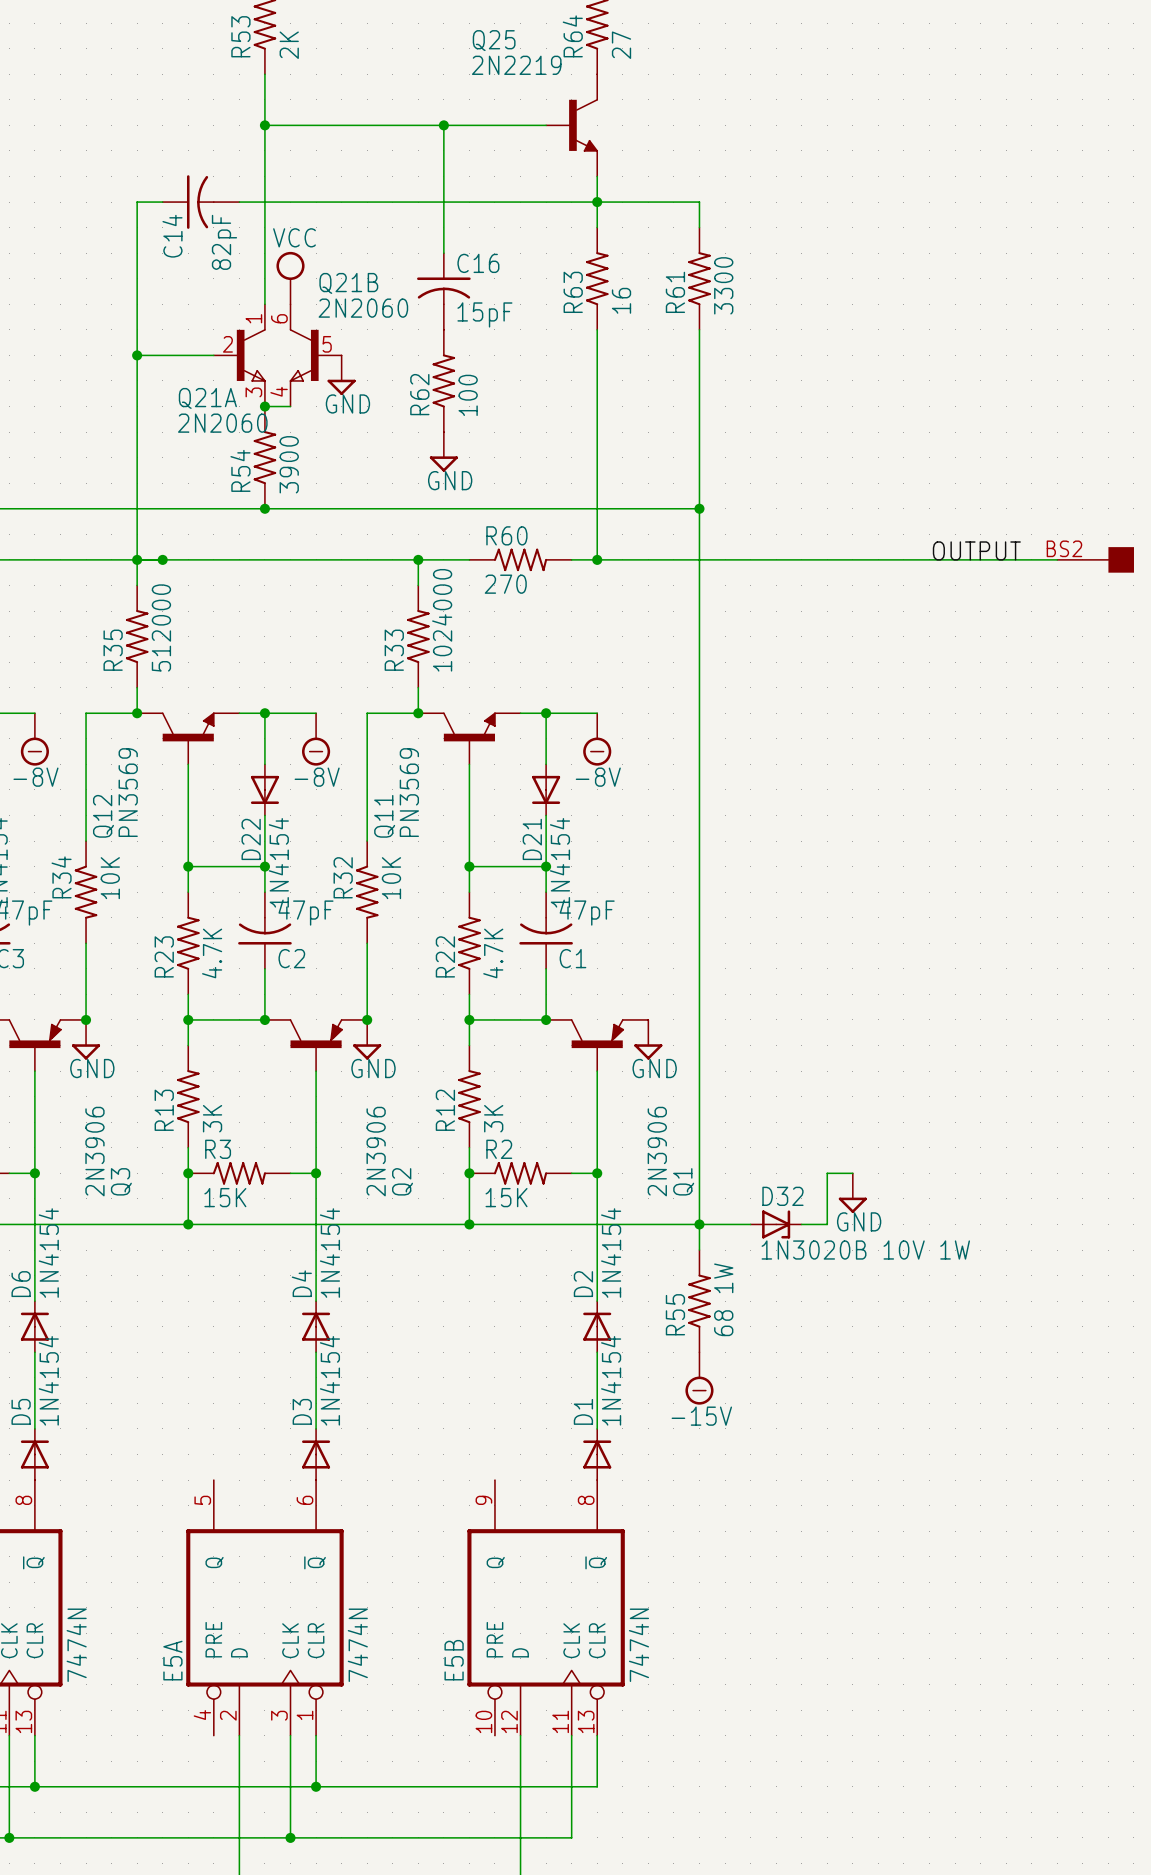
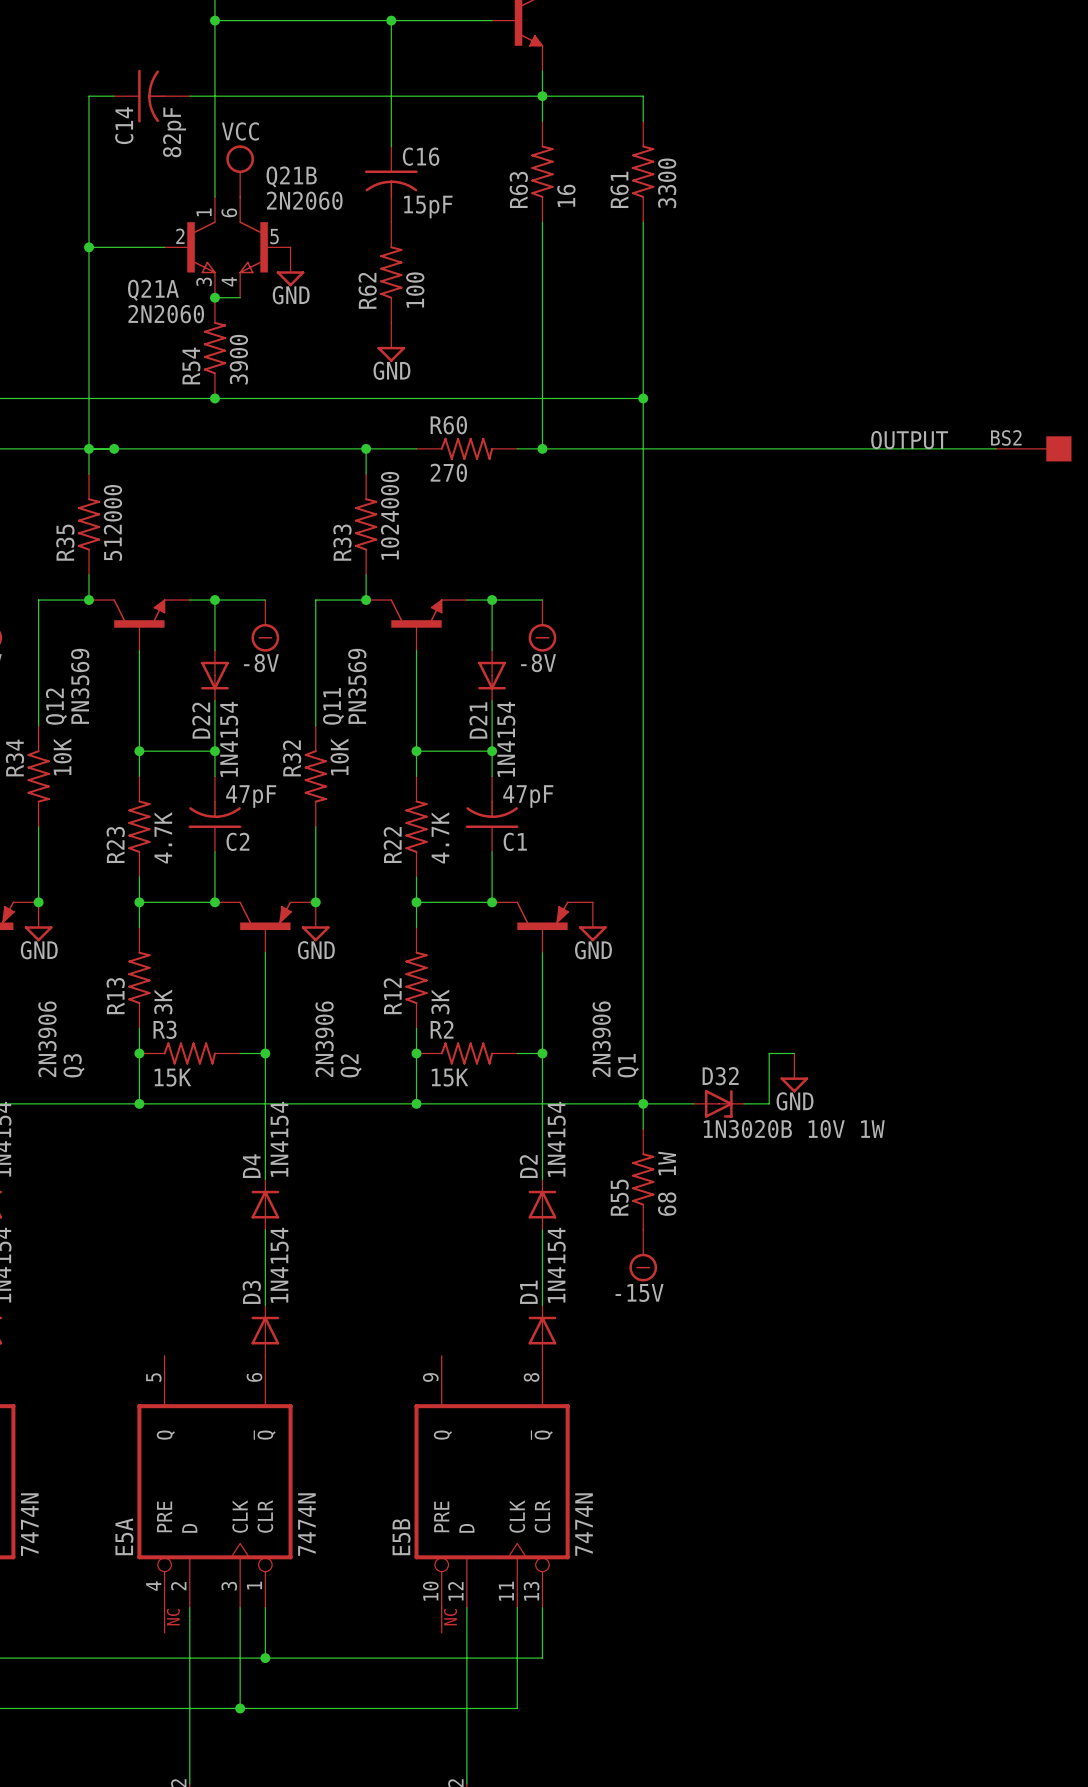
power symbol: none -> (164, 1620)
power symbol: none -> (441, 1620)

